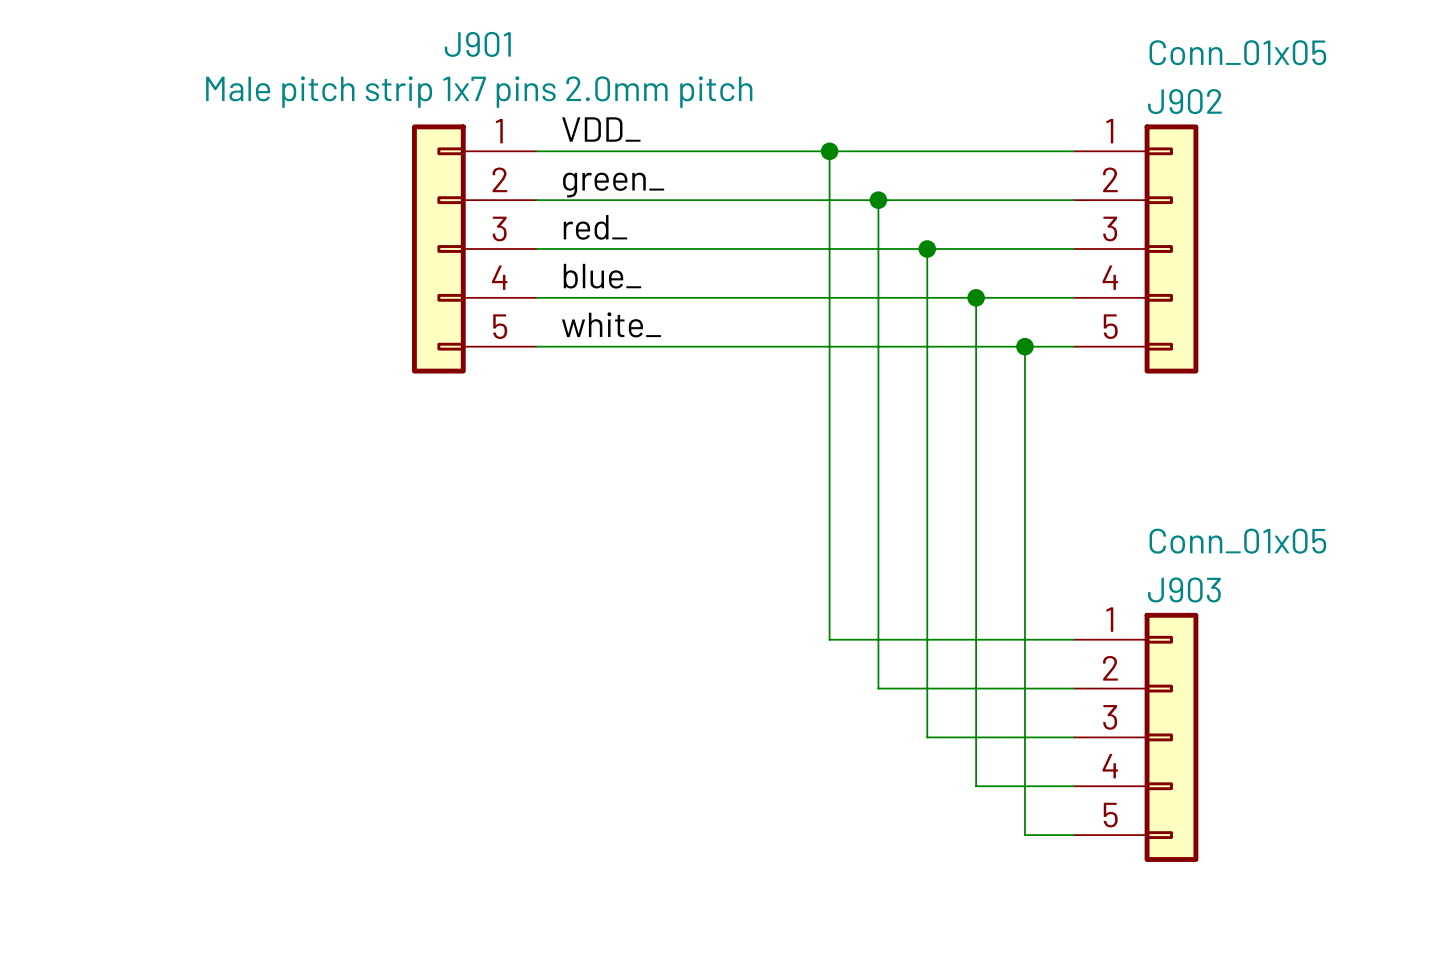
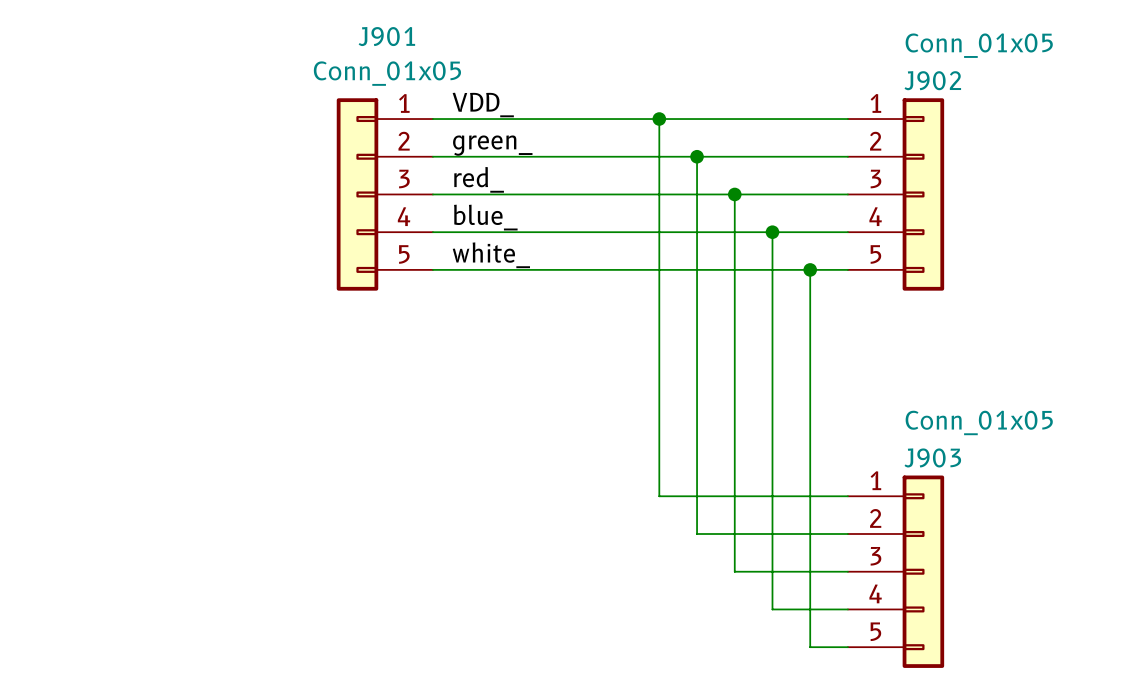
J901 value: Male pitch strip 1x7 pins 2.0mm pitch (479, 92) -> Conn_01x05 (387, 73)

